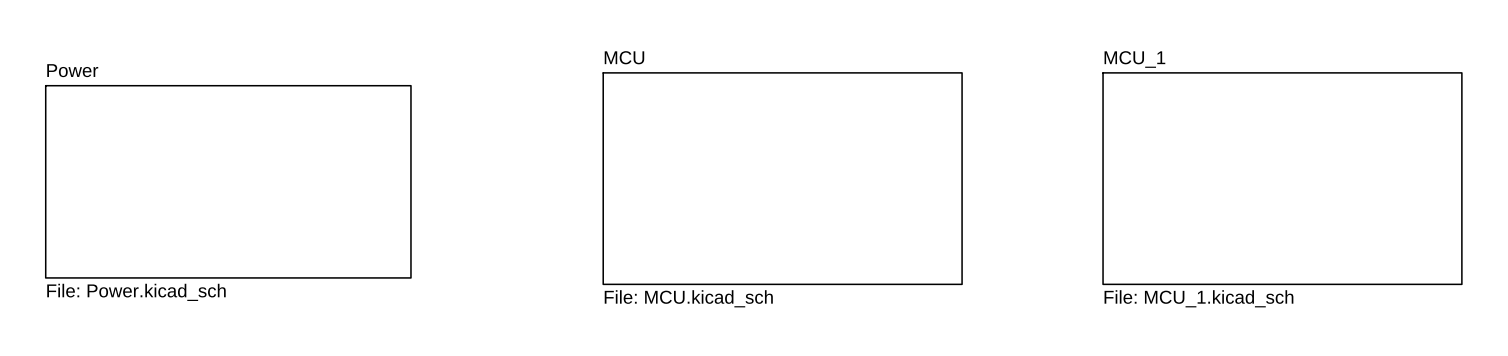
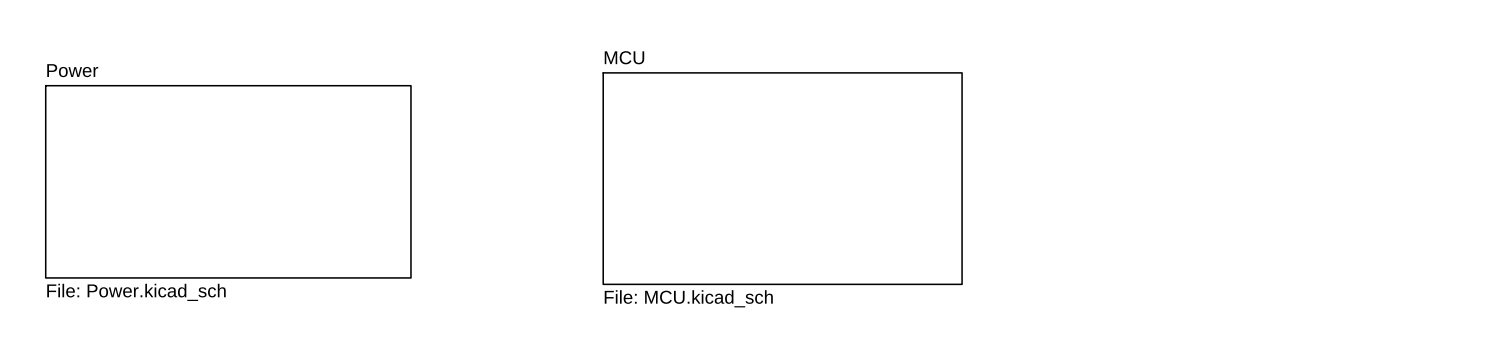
sheet MCU_1: File: MCU_1.kicad_sch (1282, 178) -> none

